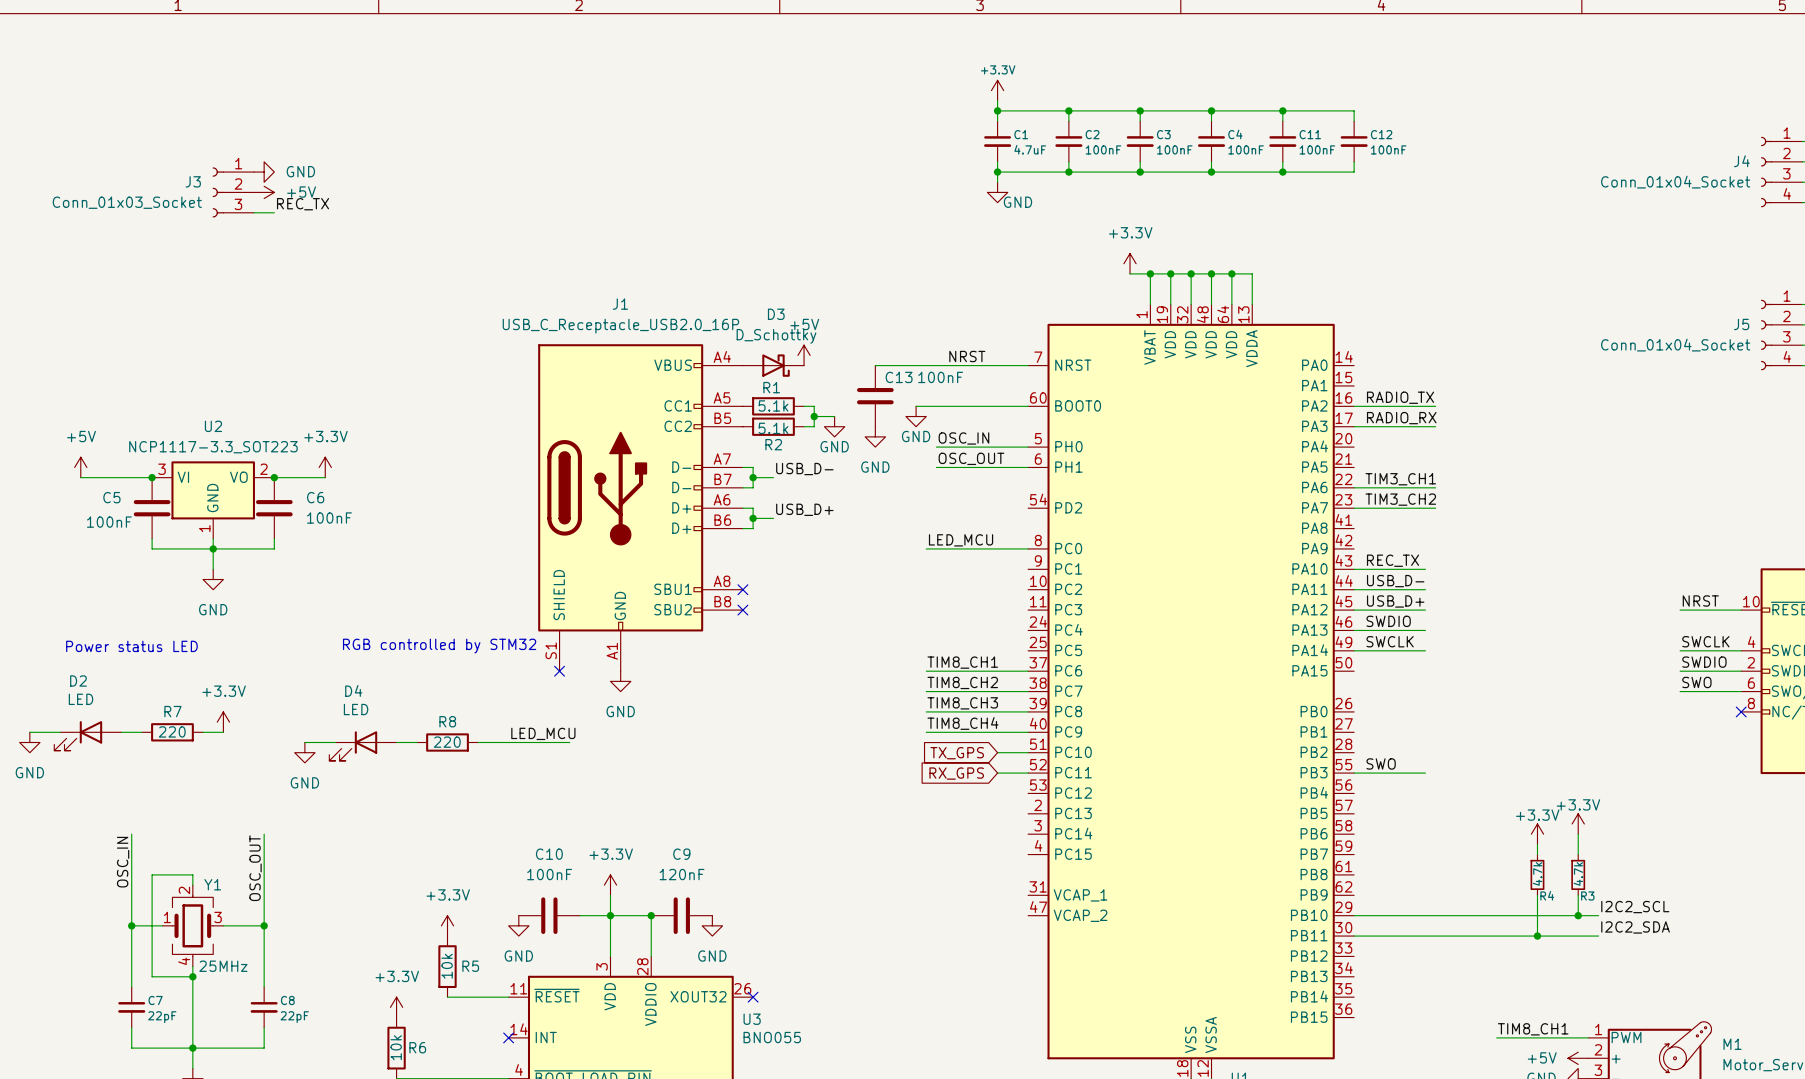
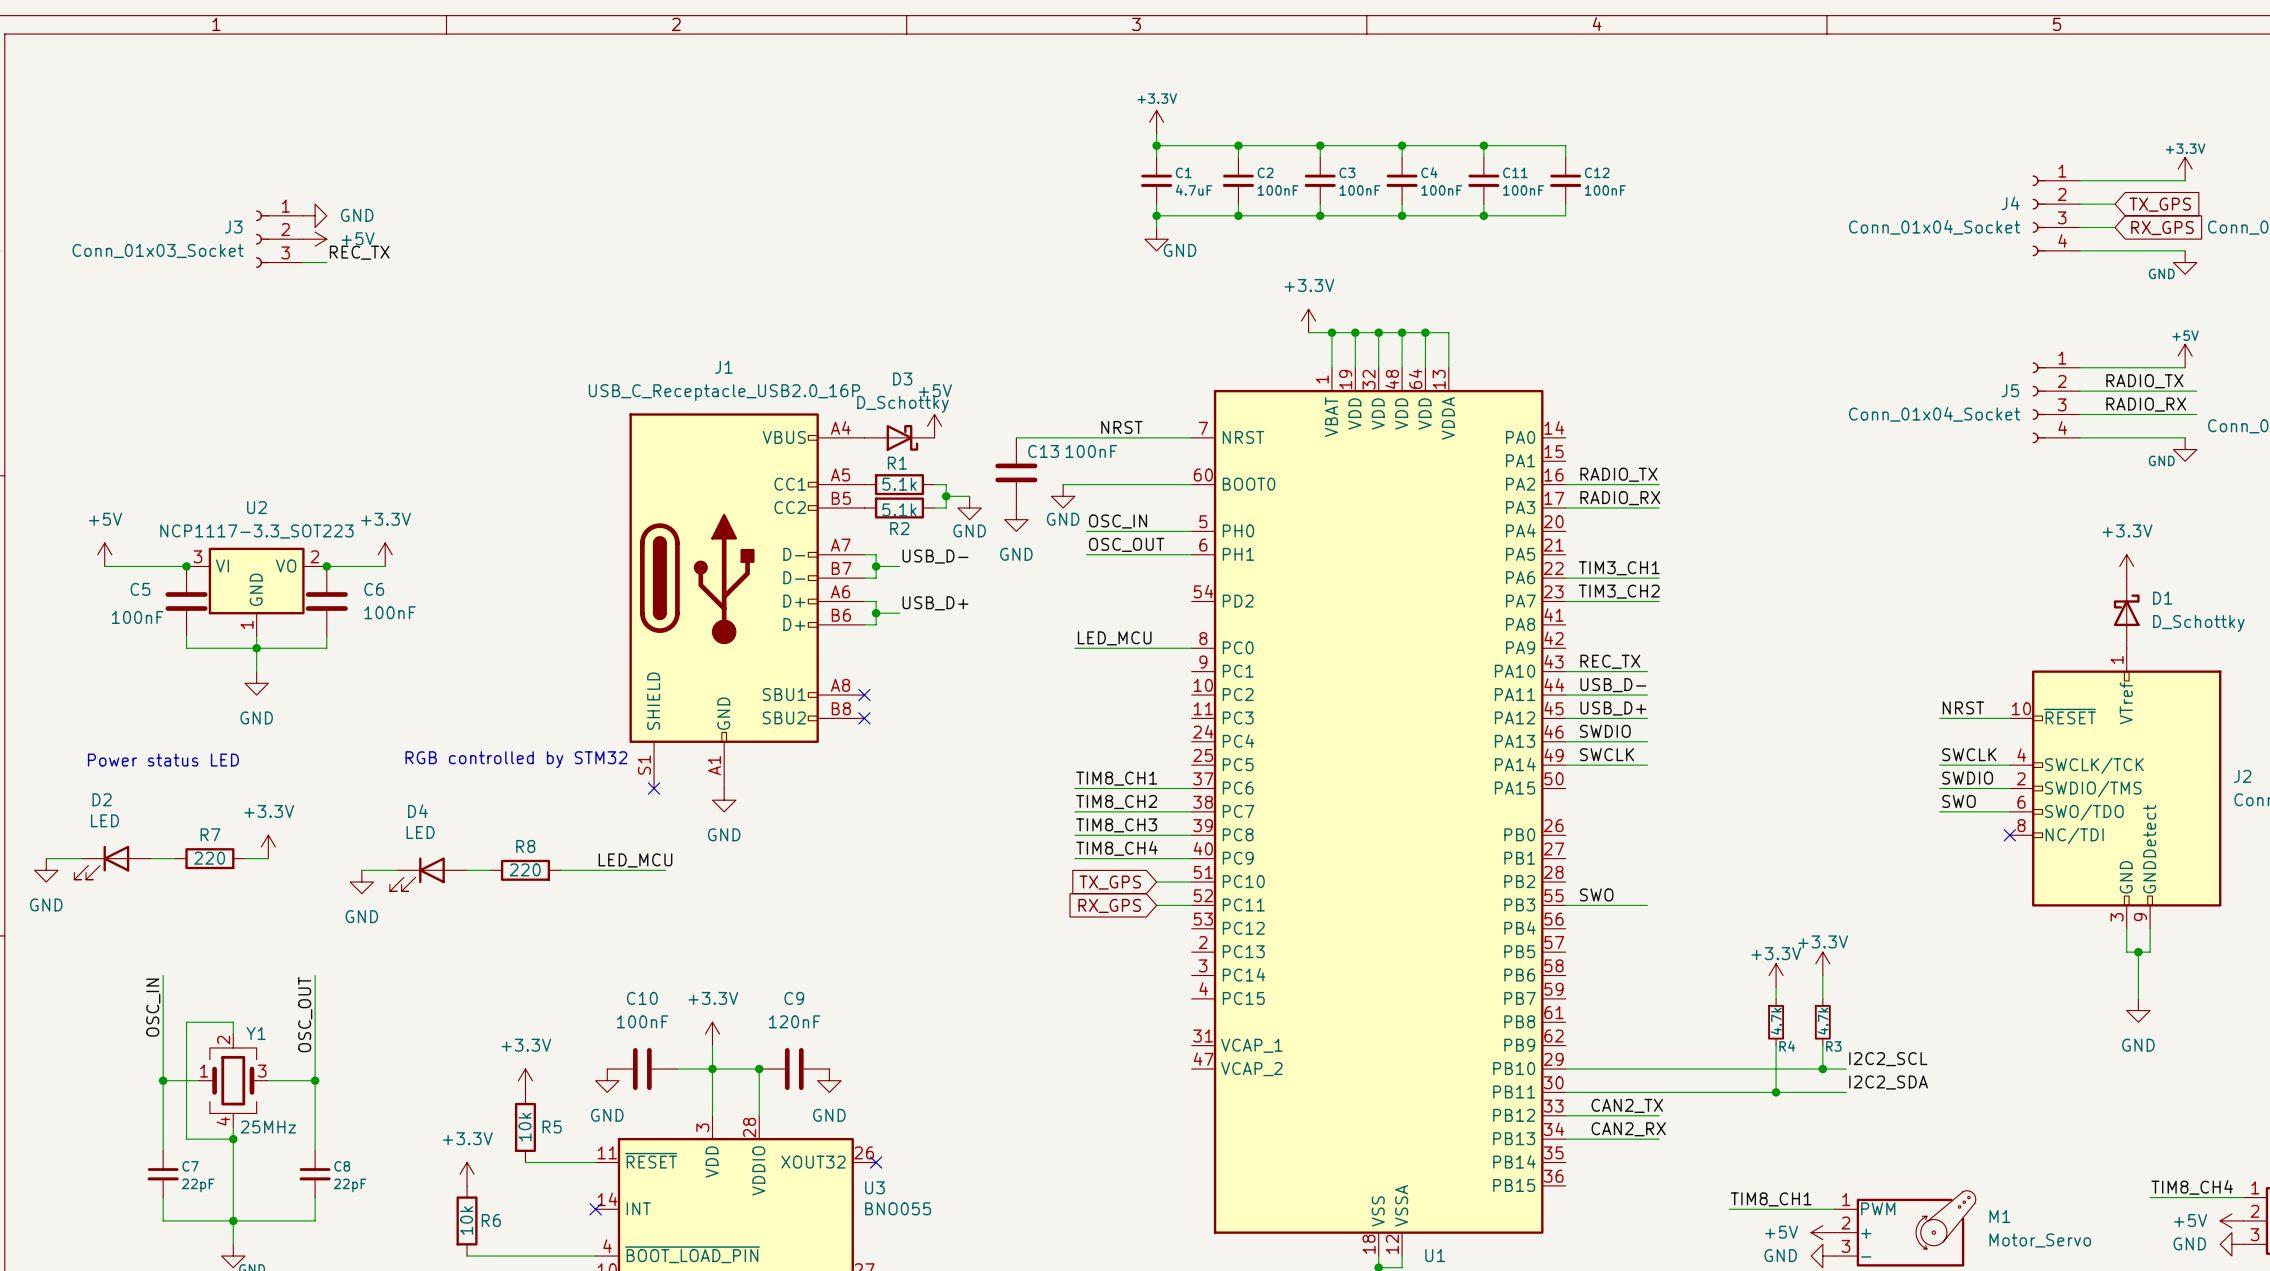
label: none -> CAN2_TX (1627, 1105)
wire: none -> (1565, 1115) (1659, 1115)
label: none -> CAN2_RX (1628, 1129)
wire: none -> (1565, 1139) (1659, 1139)

